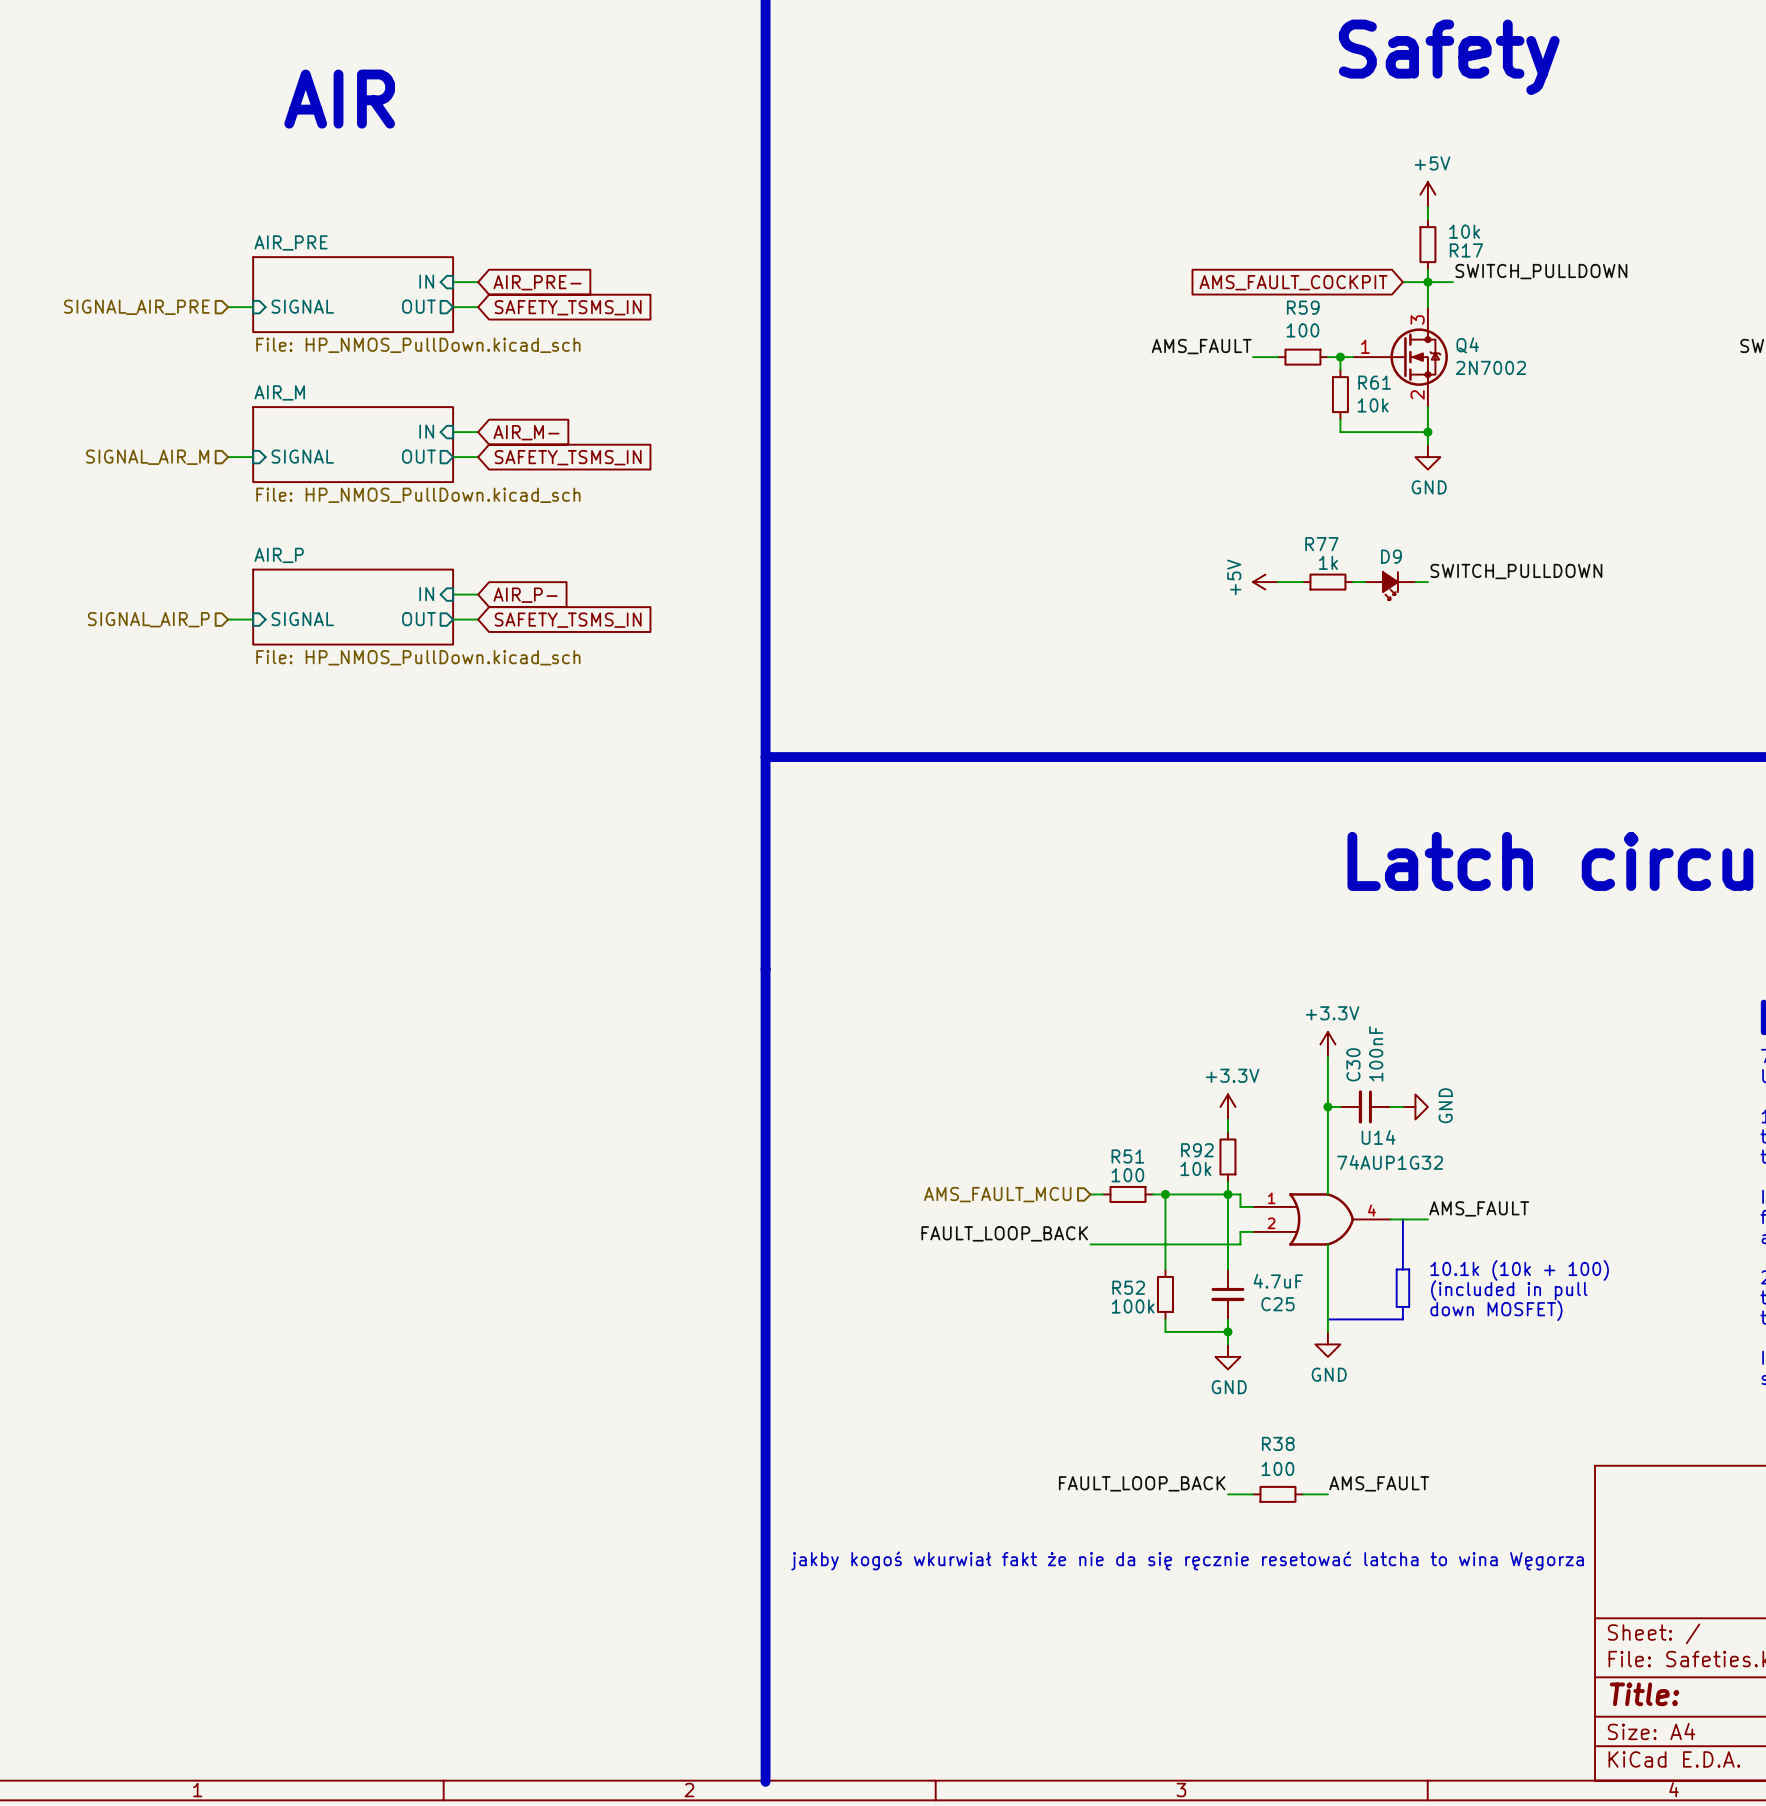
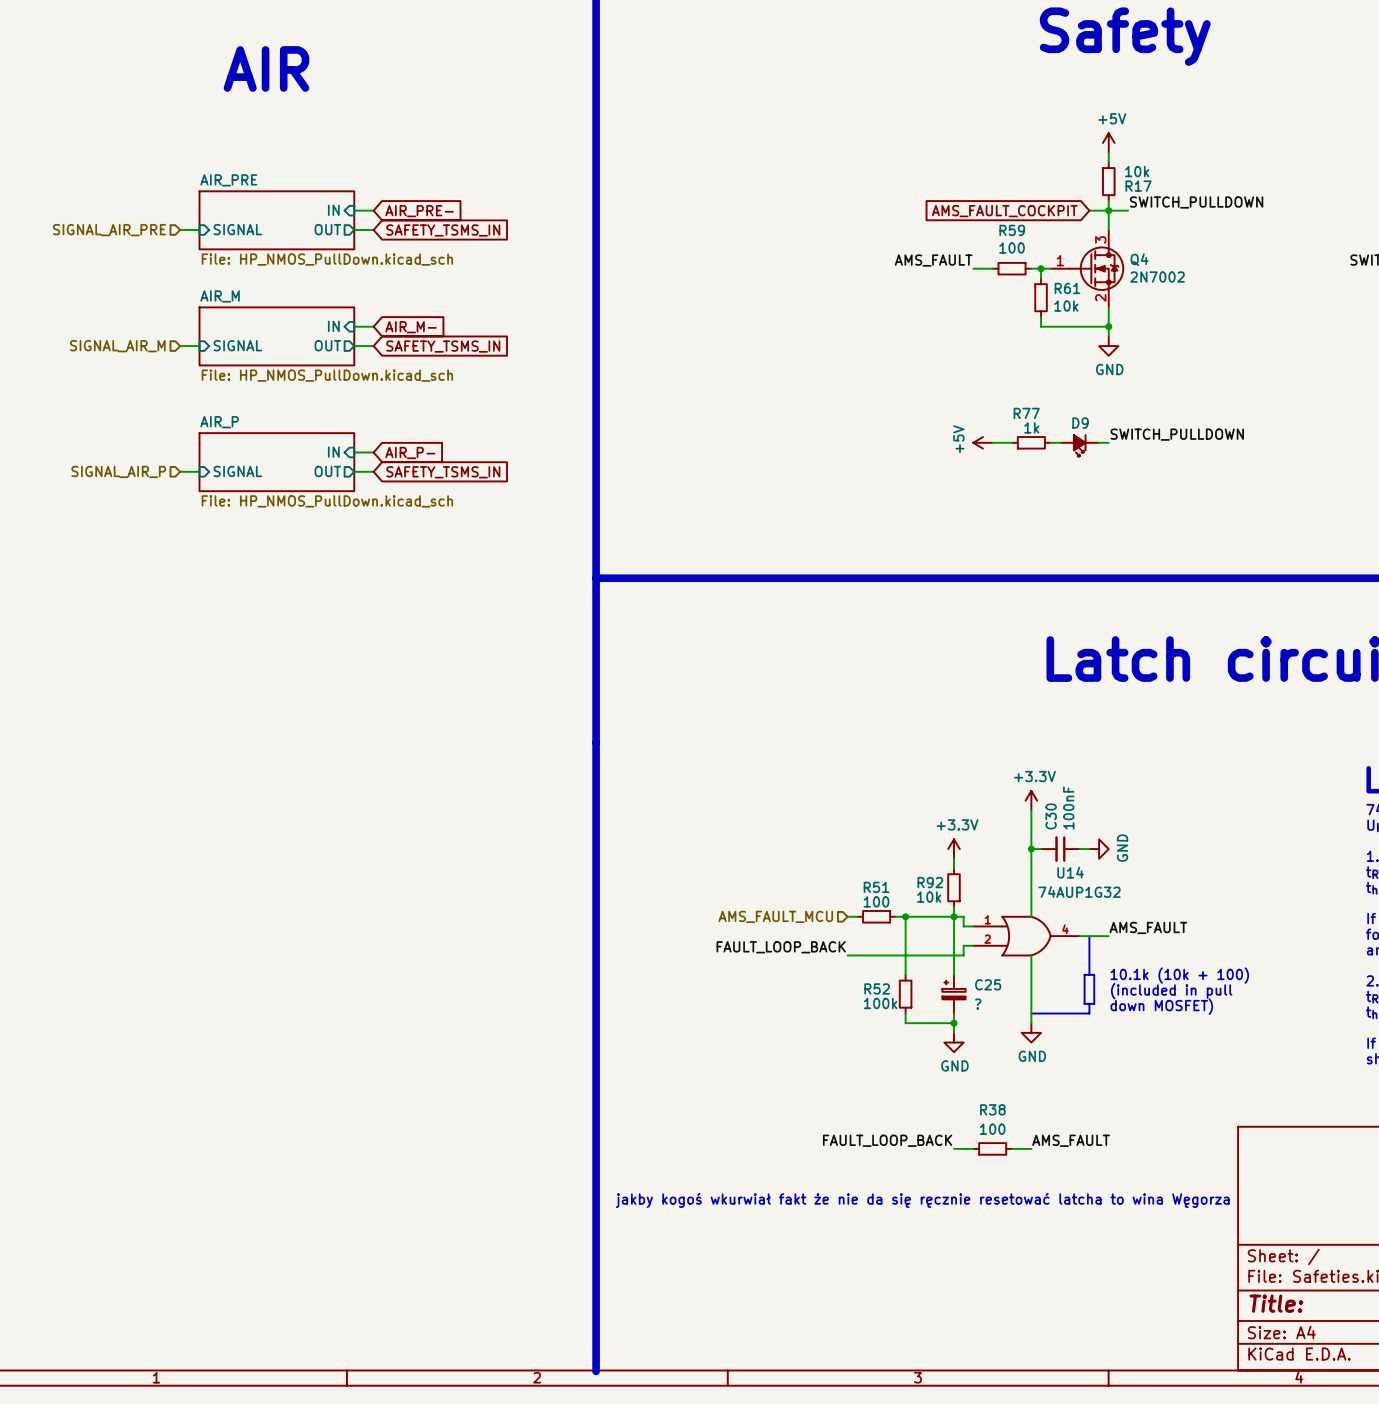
C25 symbol: [1211, 1269, 1245, 1320] -> [942, 974, 966, 1014]
C25 value: 4.7uF (1278, 1281) -> ? (978, 1004)
C25 name position: C25 (1277, 1304) -> C25 (988, 984)

